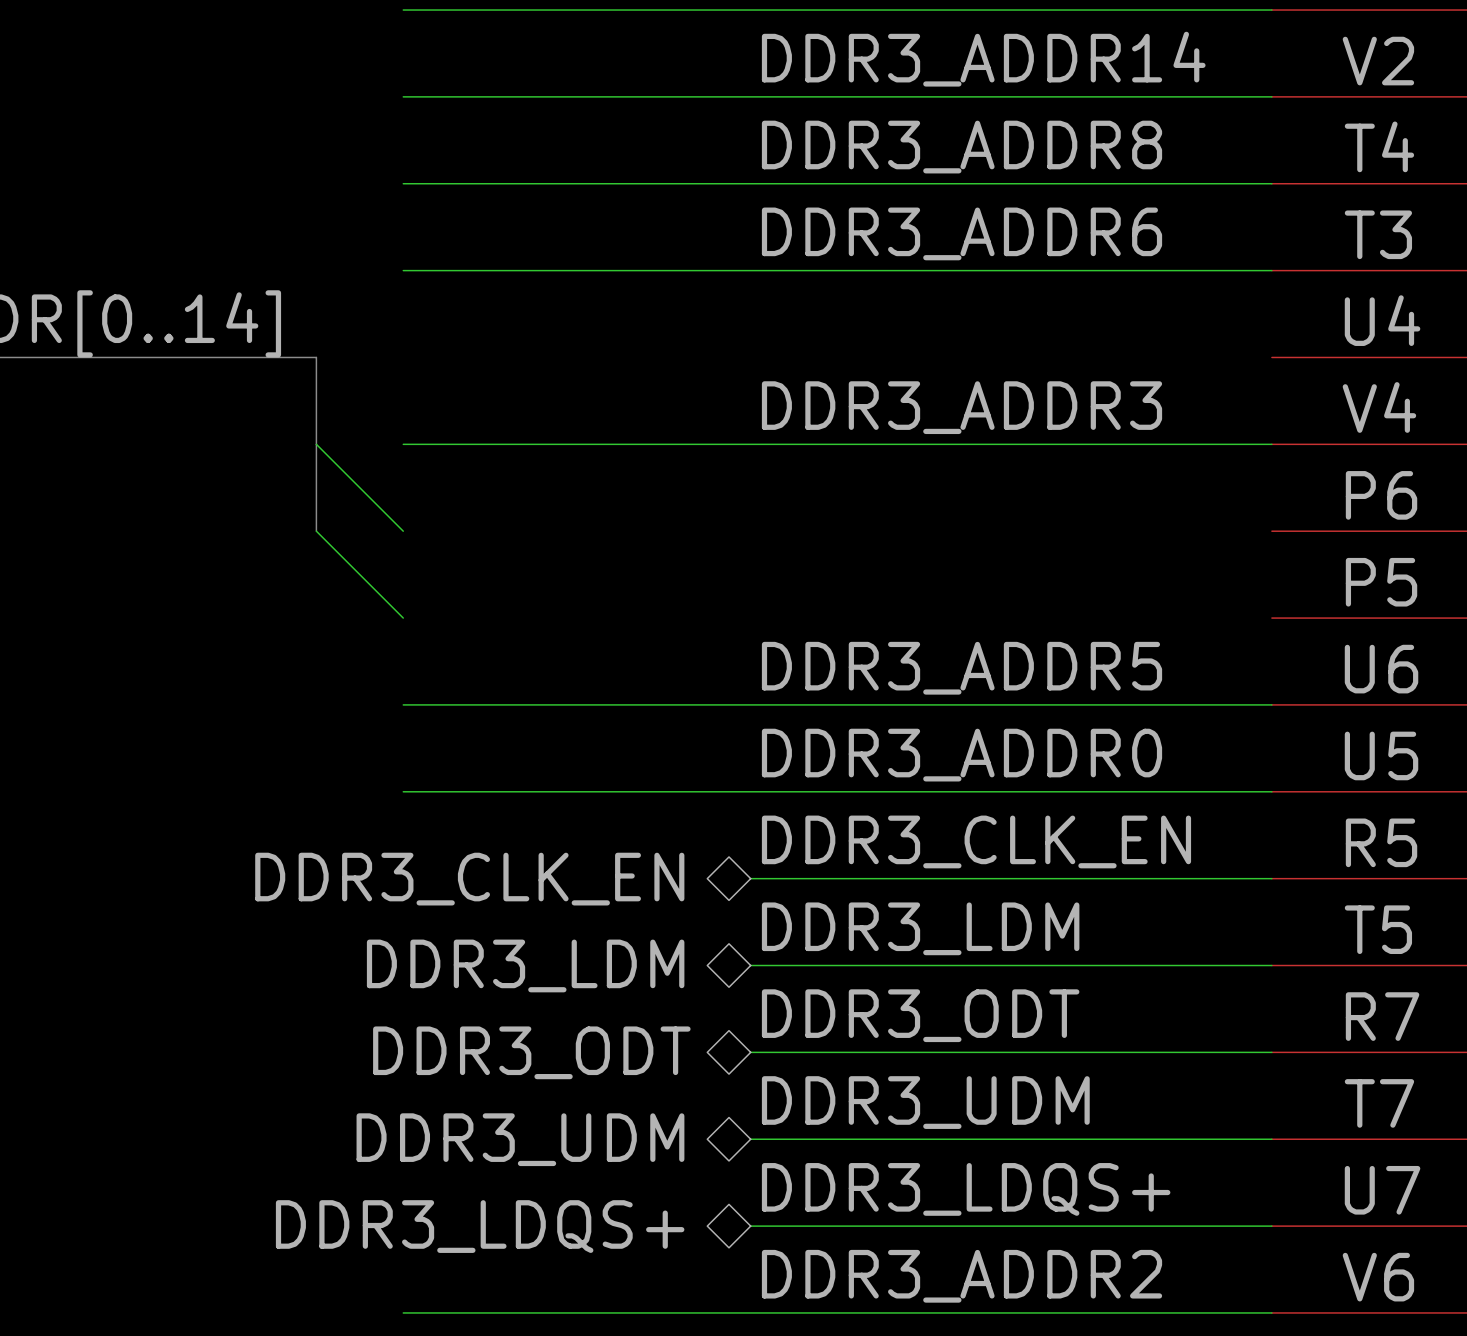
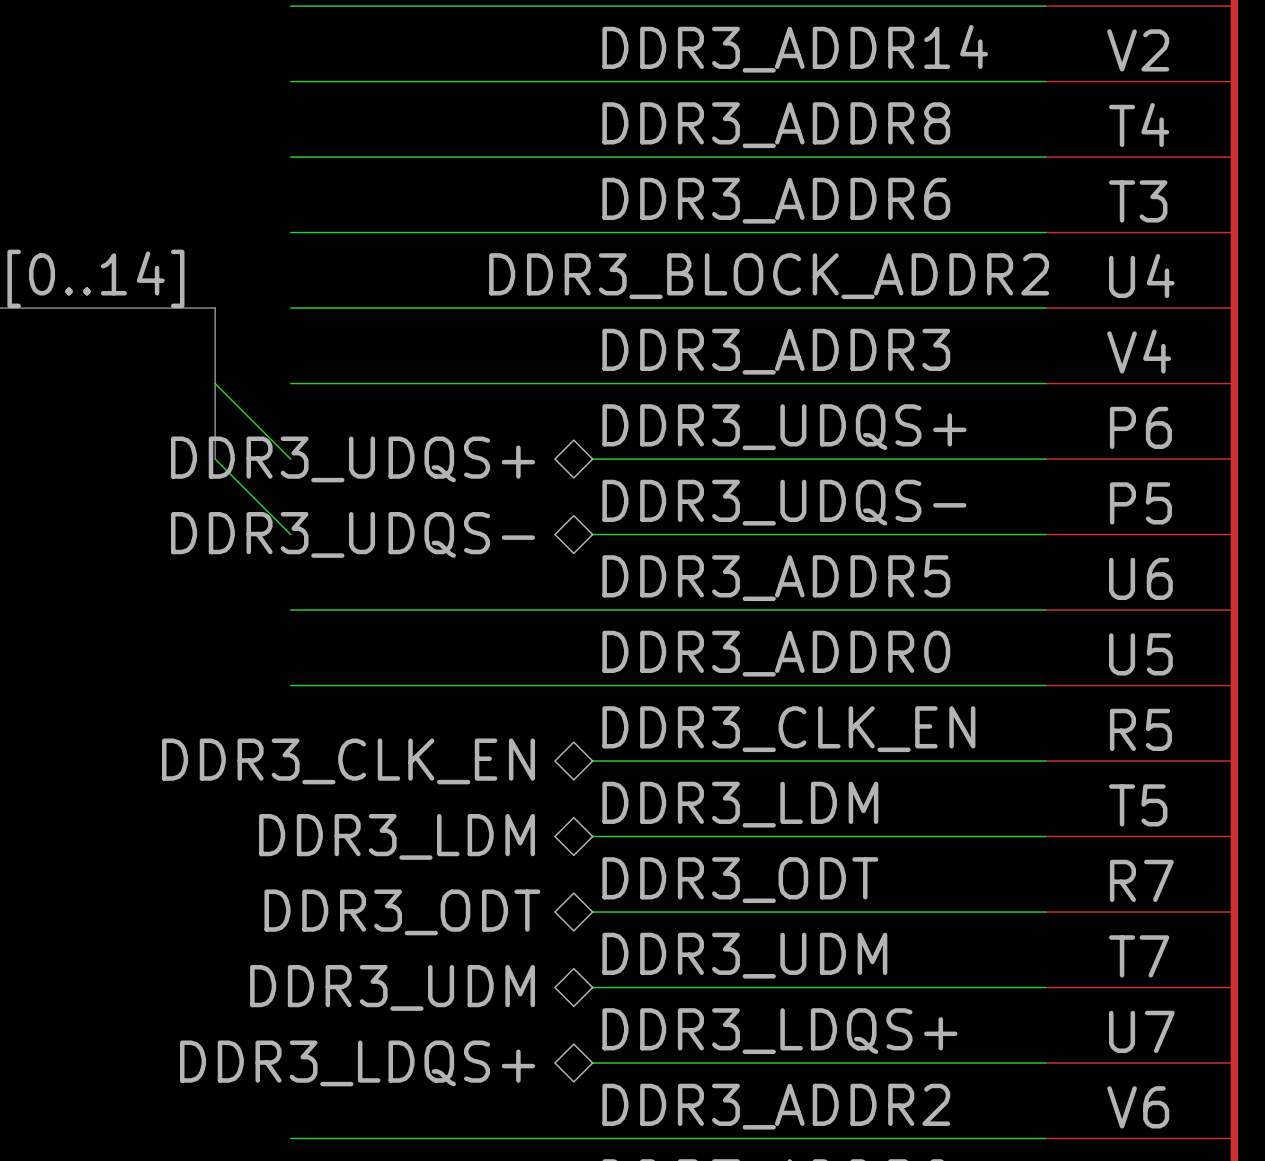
label: none -> DDR3_BLOCK_ADDR2 (769, 276)
wire: none -> (290, 308) (1045, 308)
label: none -> DDR3_UDQS+ (784, 427)
hierarchical label: none -> DDR3_UDQS+ (353, 459)
wire: none -> (592, 459) (1045, 459)
label: none -> DDR3_UDQS- (784, 502)
hierarchical label: none -> DDR3_UDQS- (353, 534)
wire: none -> (592, 534) (1045, 534)

